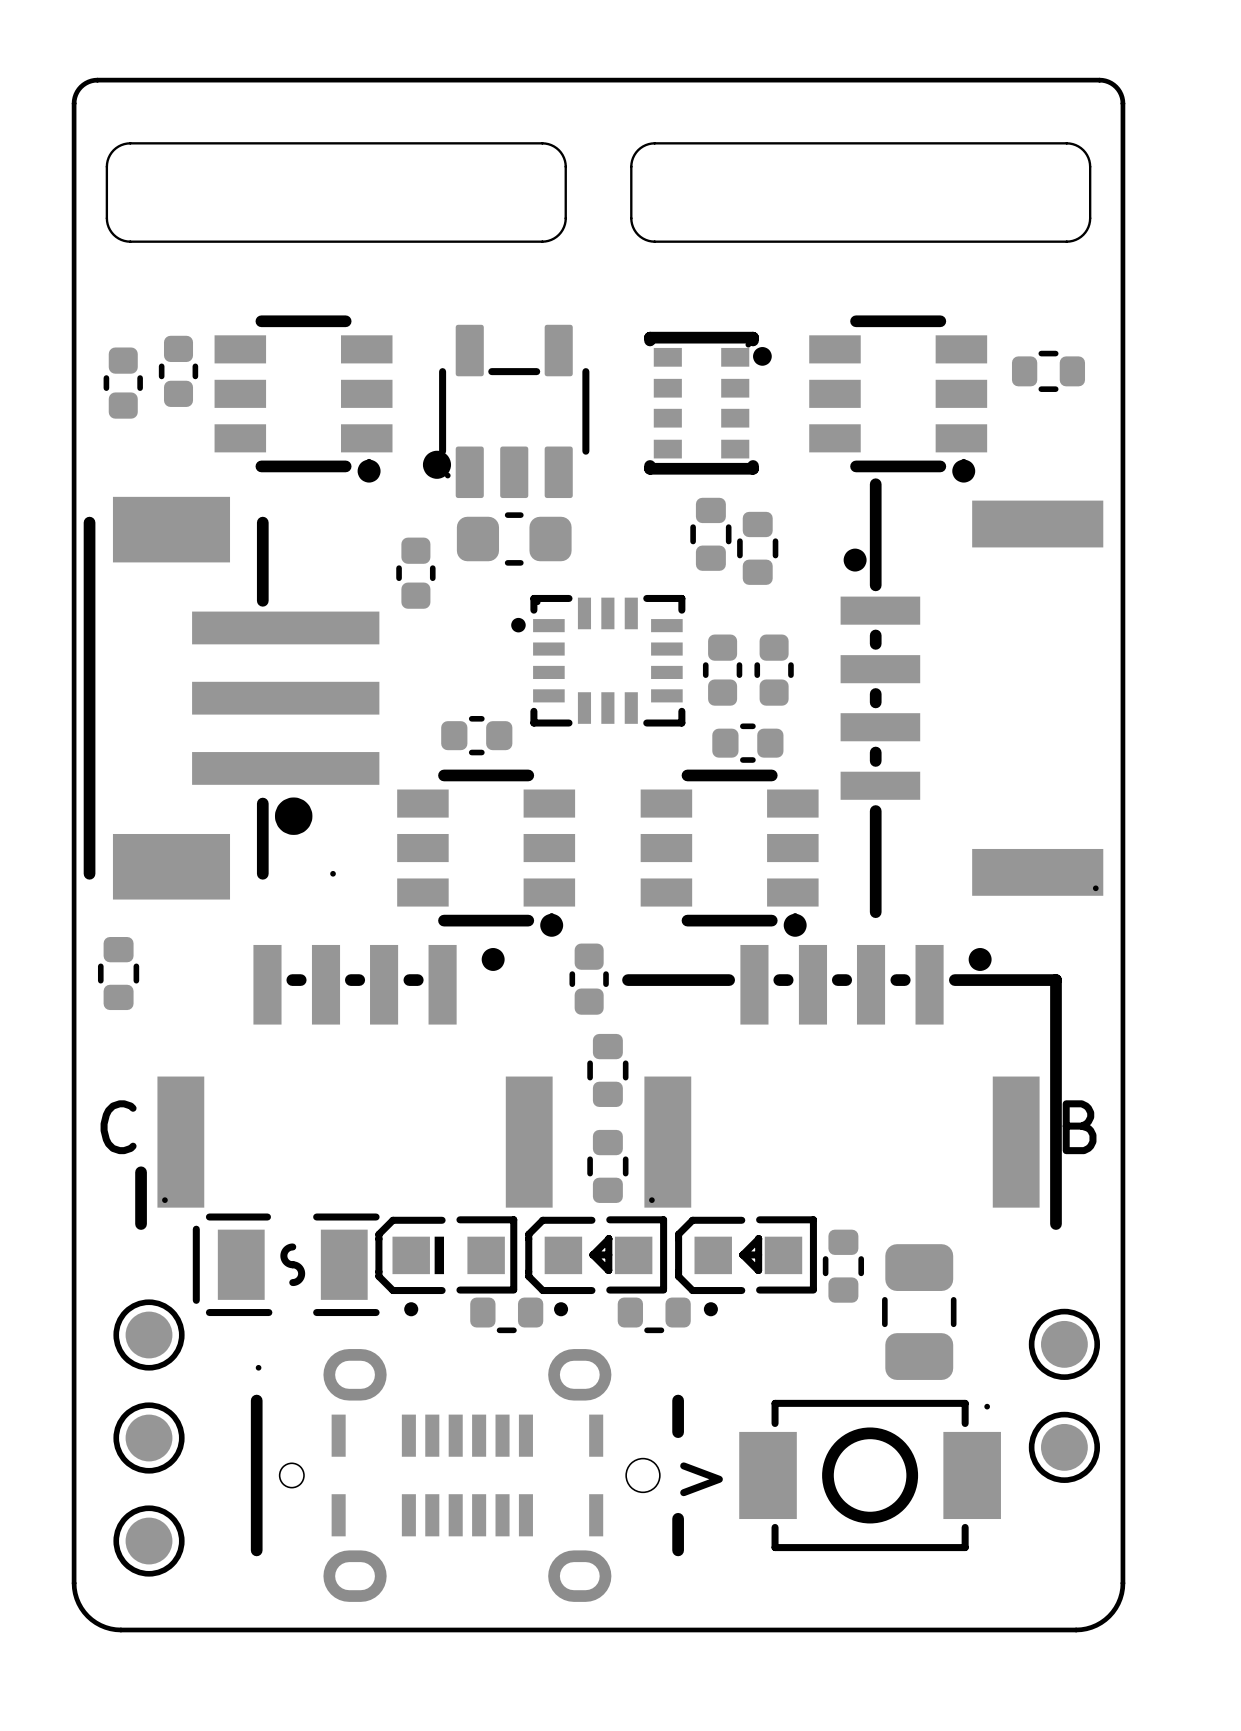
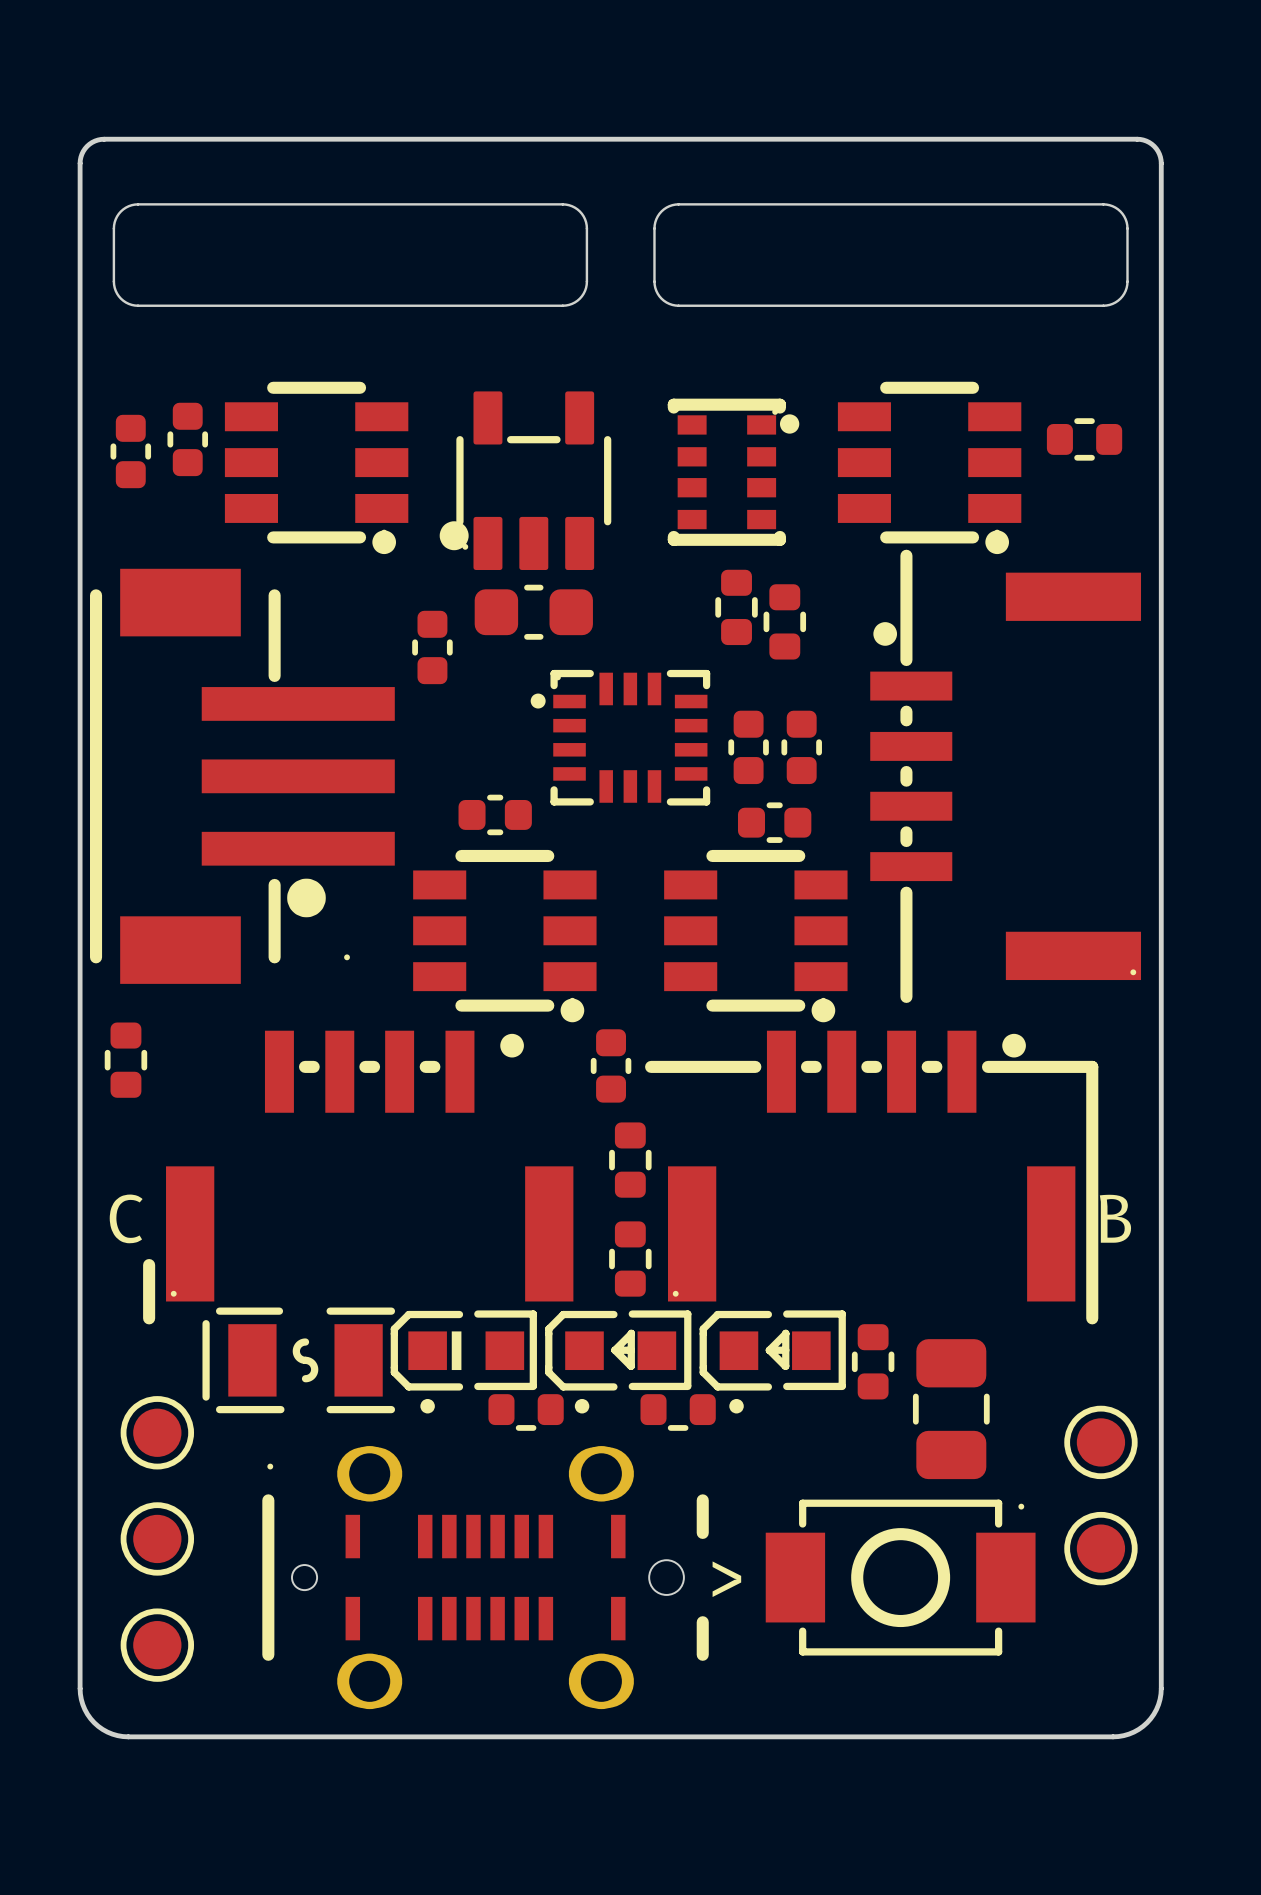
part footprint: [250, 1349, 684, 1602] -> [262, 1446, 709, 1710]

